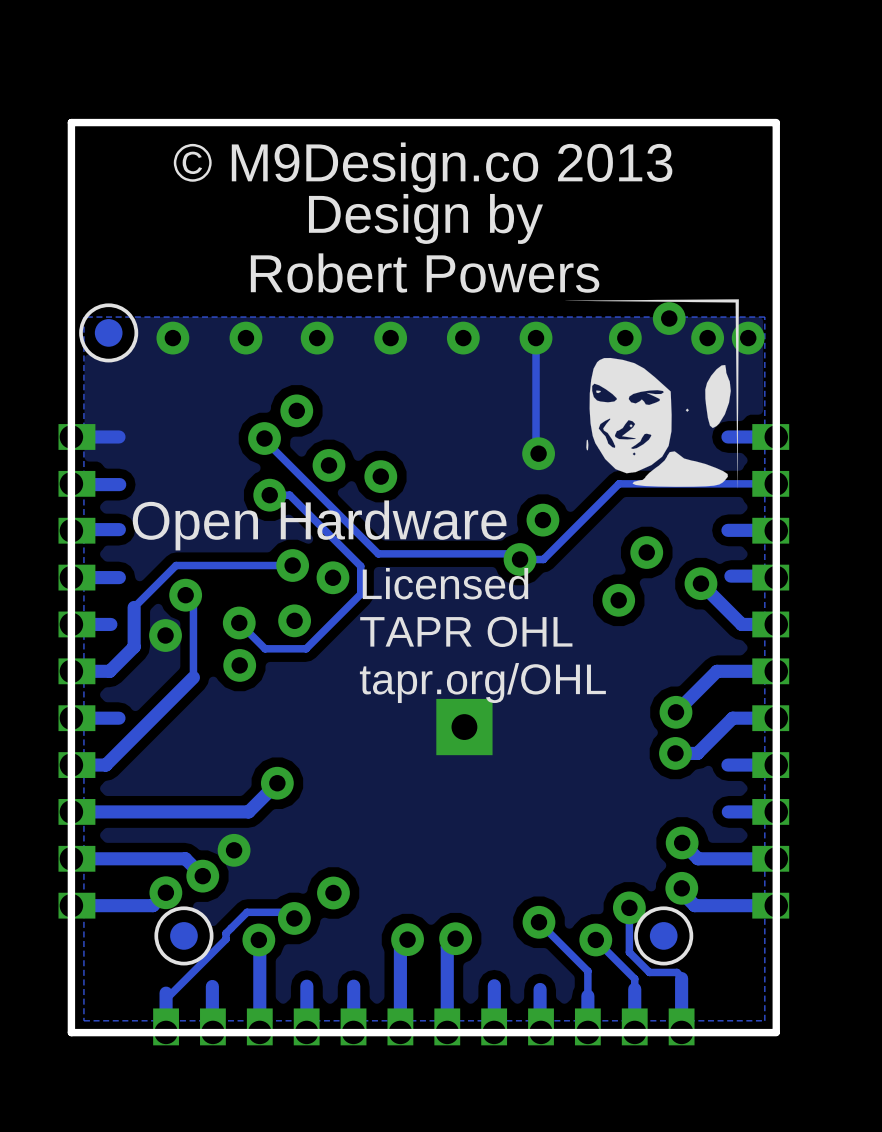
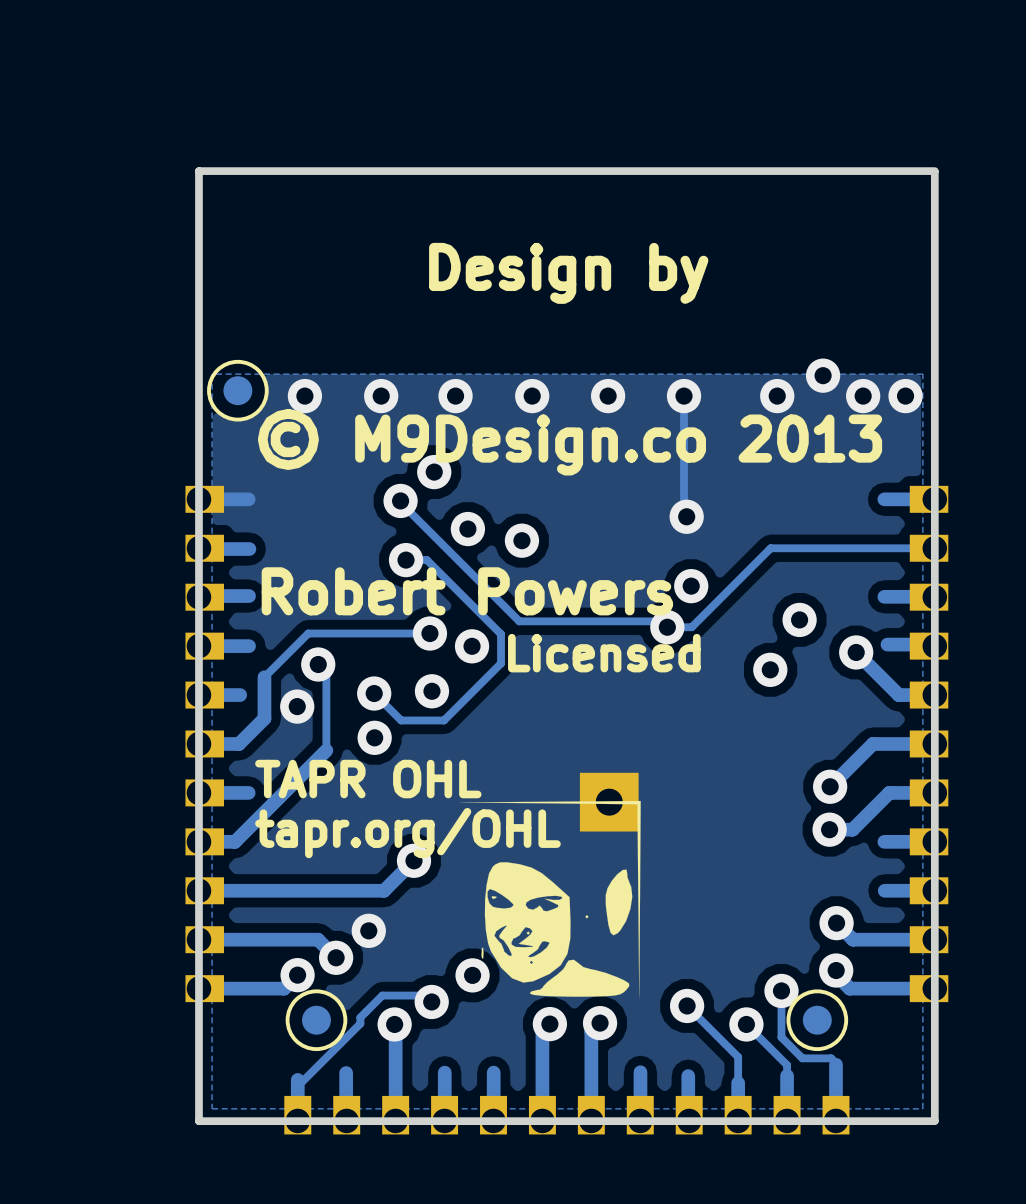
text position: © M9Design.co 2013 (423, 167) -> © M9Design.co 2013 (570, 442)
text position: Robert Powers (425, 273) -> Robert Powers (467, 591)
drawing position: (652, 393) -> (550, 899)
text: Open Hardware (319, 525) -> none
text position: TAPR OHL (466, 631) -> TAPR OHL (368, 779)
text position: tapr.org/OHL (482, 683) -> tapr.org/OHL (407, 833)

